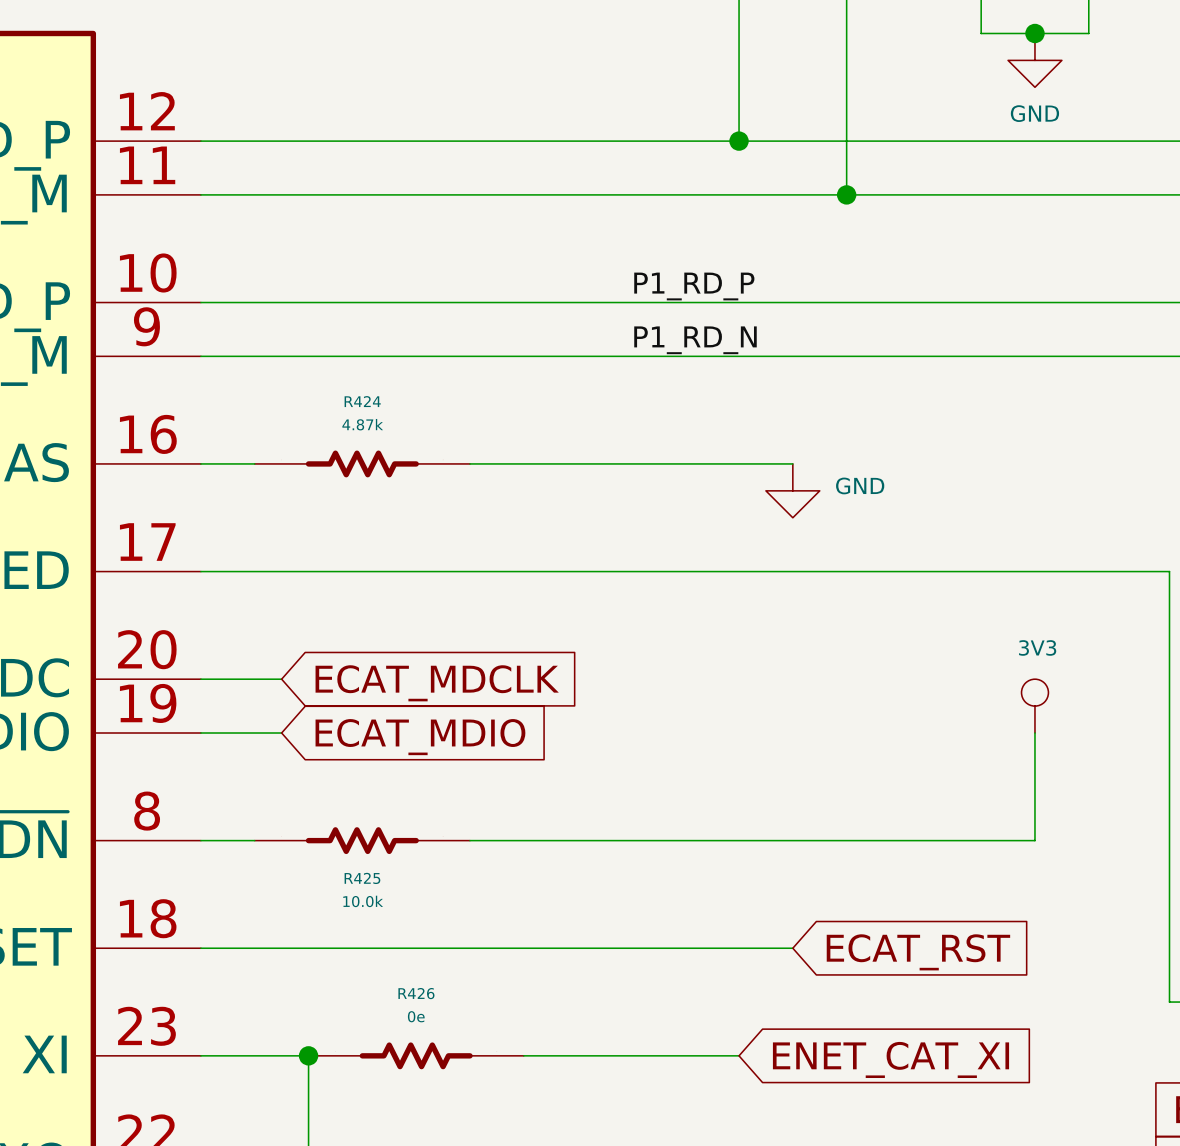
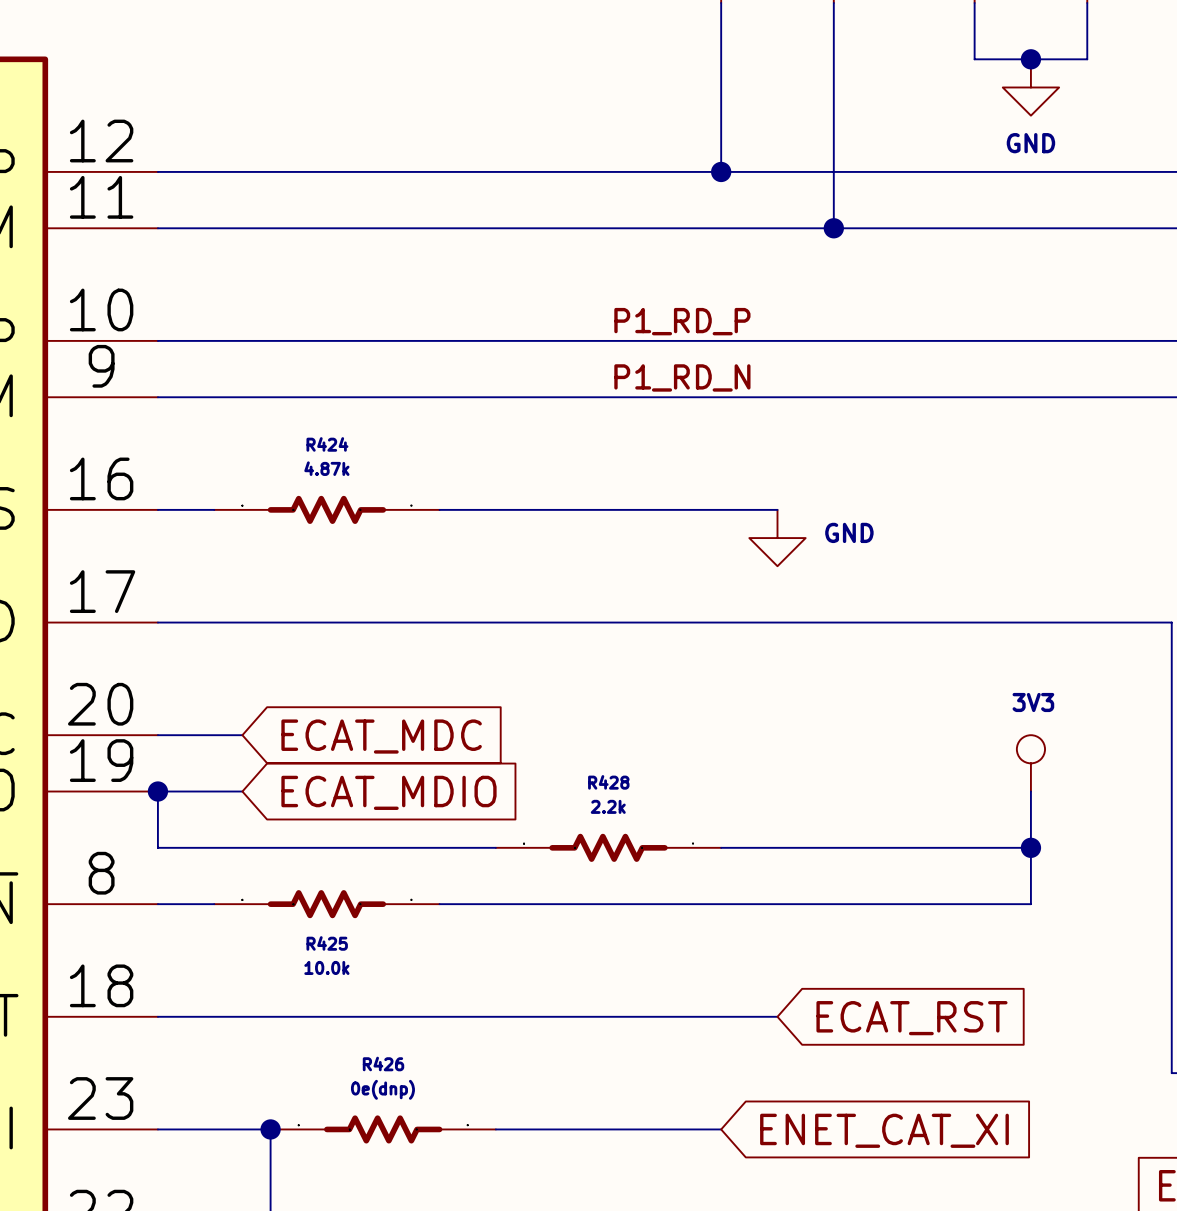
global label: ECAT_MDCLK (437, 683) -> ECAT_MDC (381, 736)
wire: none -> (157, 791) (157, 847) (495, 847)
junction: none -> (157, 791)
R428: none -> 2.2k (608, 847)
wire: none -> (721, 847) (1030, 847)
junction: none -> (1030, 847)
R426 value: 0e (416, 1016) -> 0e(dnp) (382, 1089)

